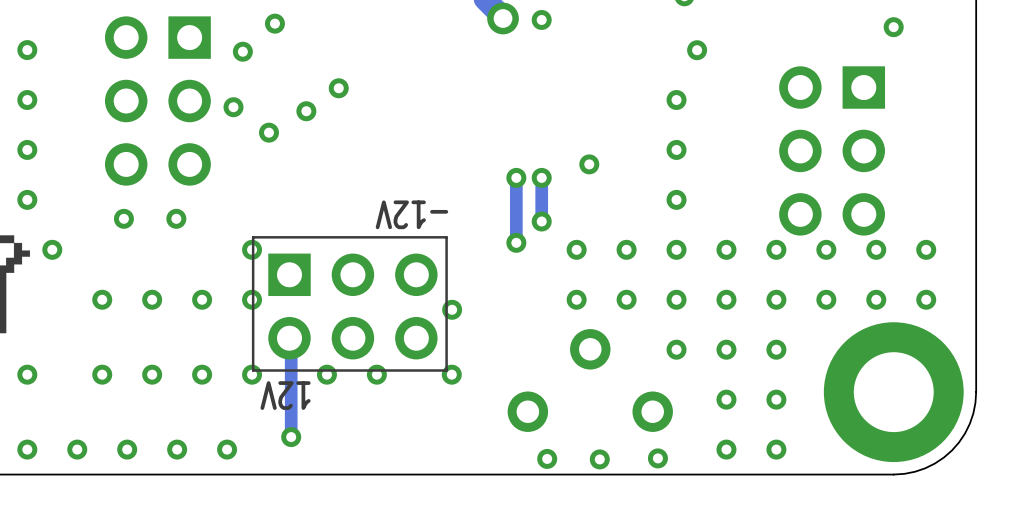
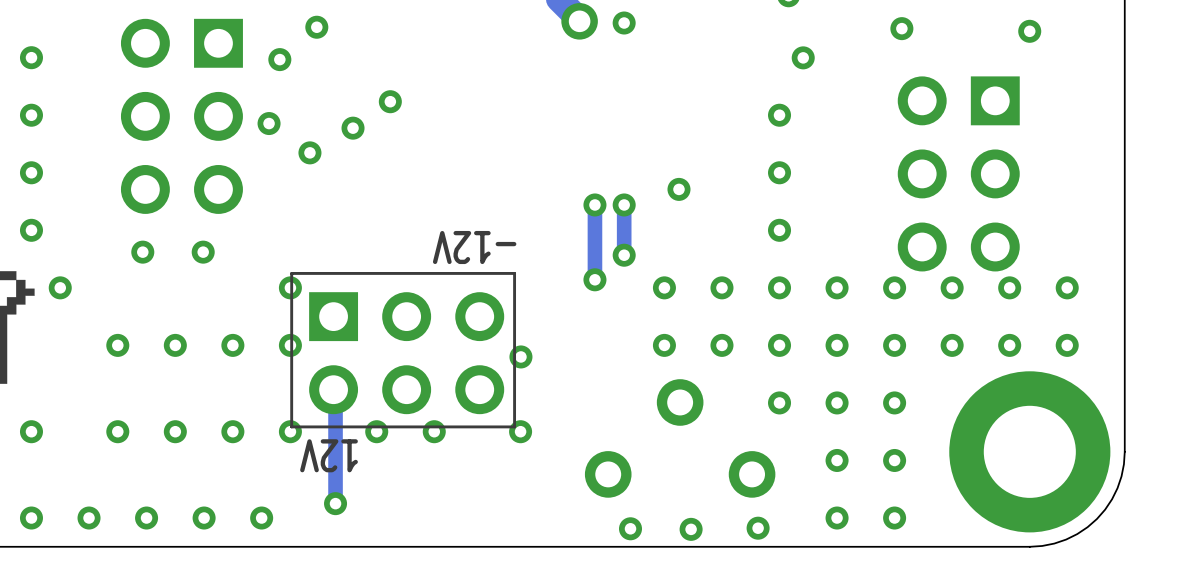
via: none -> (901, 28)

